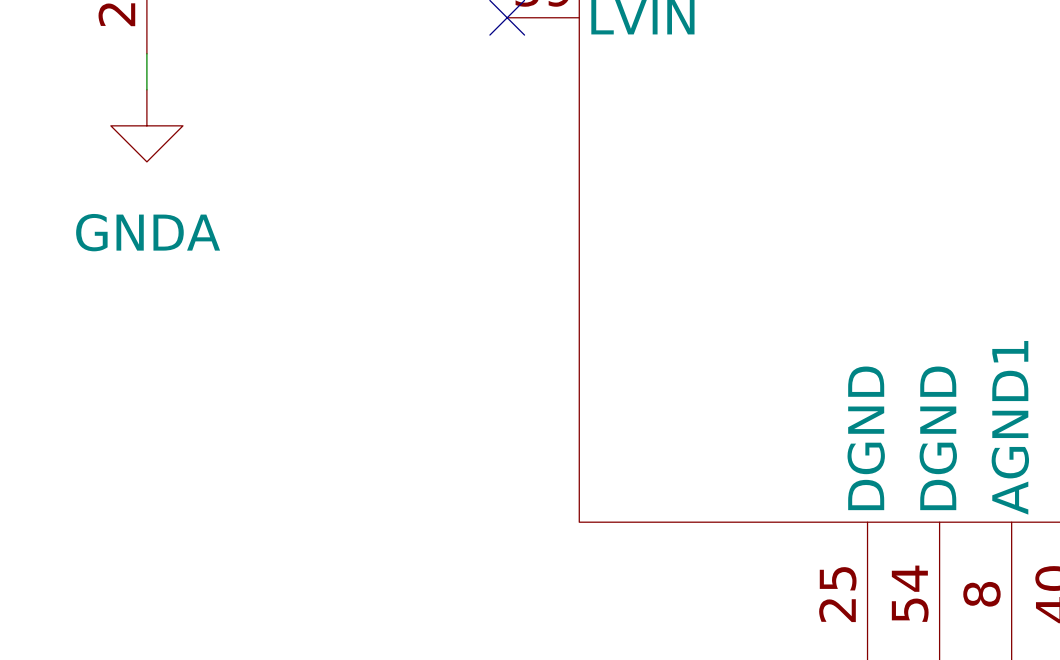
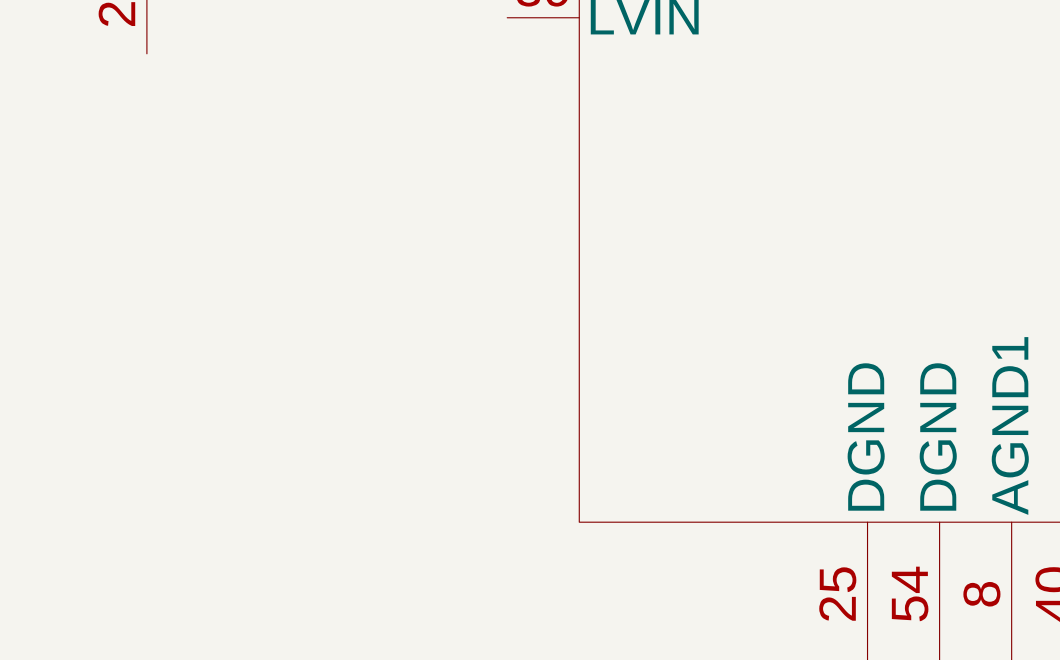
no-connect mark: (507, 17) -> none
wire: (146, 53) (146, 89) -> none
power symbol: GNDA (146, 125) -> none

